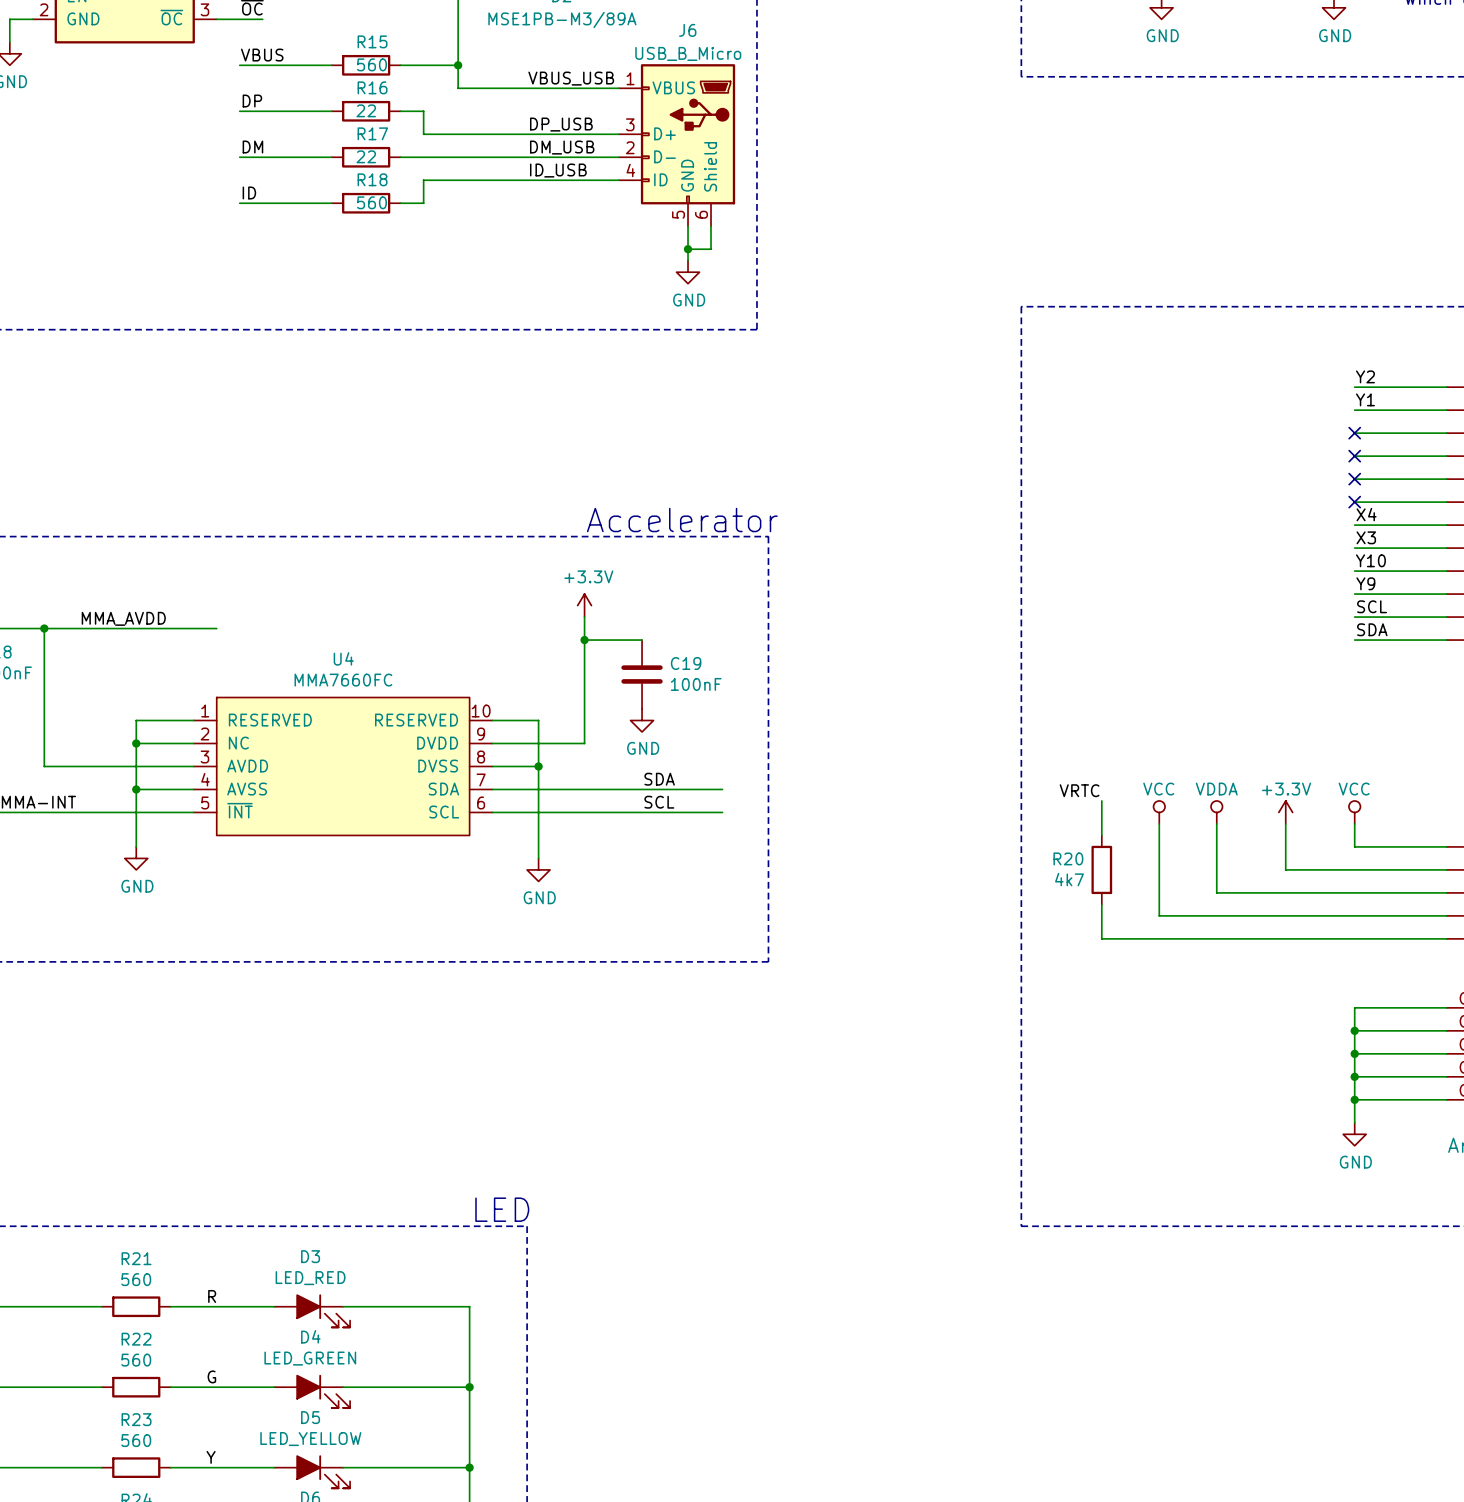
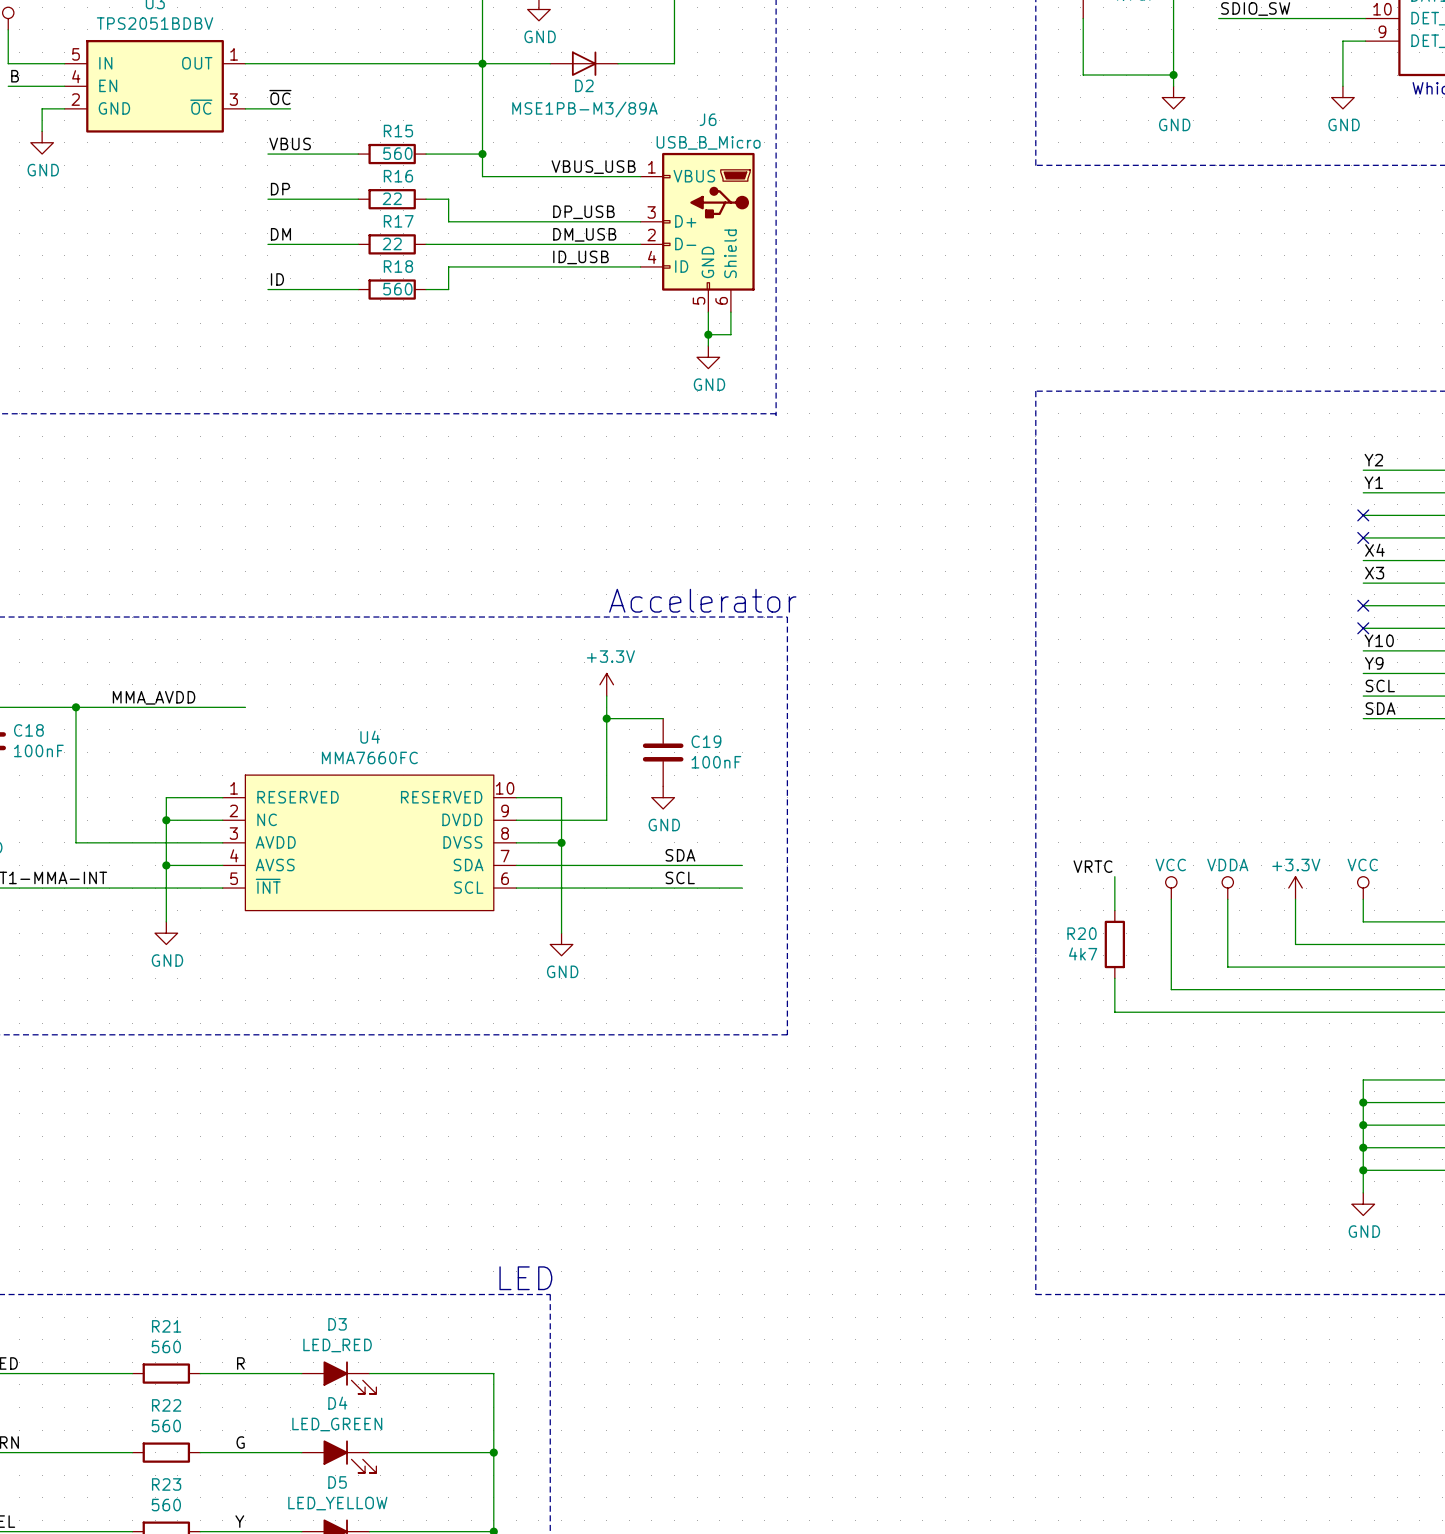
no-connect mark: (1354, 479) -> none
no-connect mark: (1354, 502) -> none
label position: X4 (1366, 514) -> X4 (1374, 550)
no-connect mark: none -> (1363, 605)
label position: X3 (1366, 537) -> X3 (1374, 573)
no-connect mark: none -> (1363, 628)

